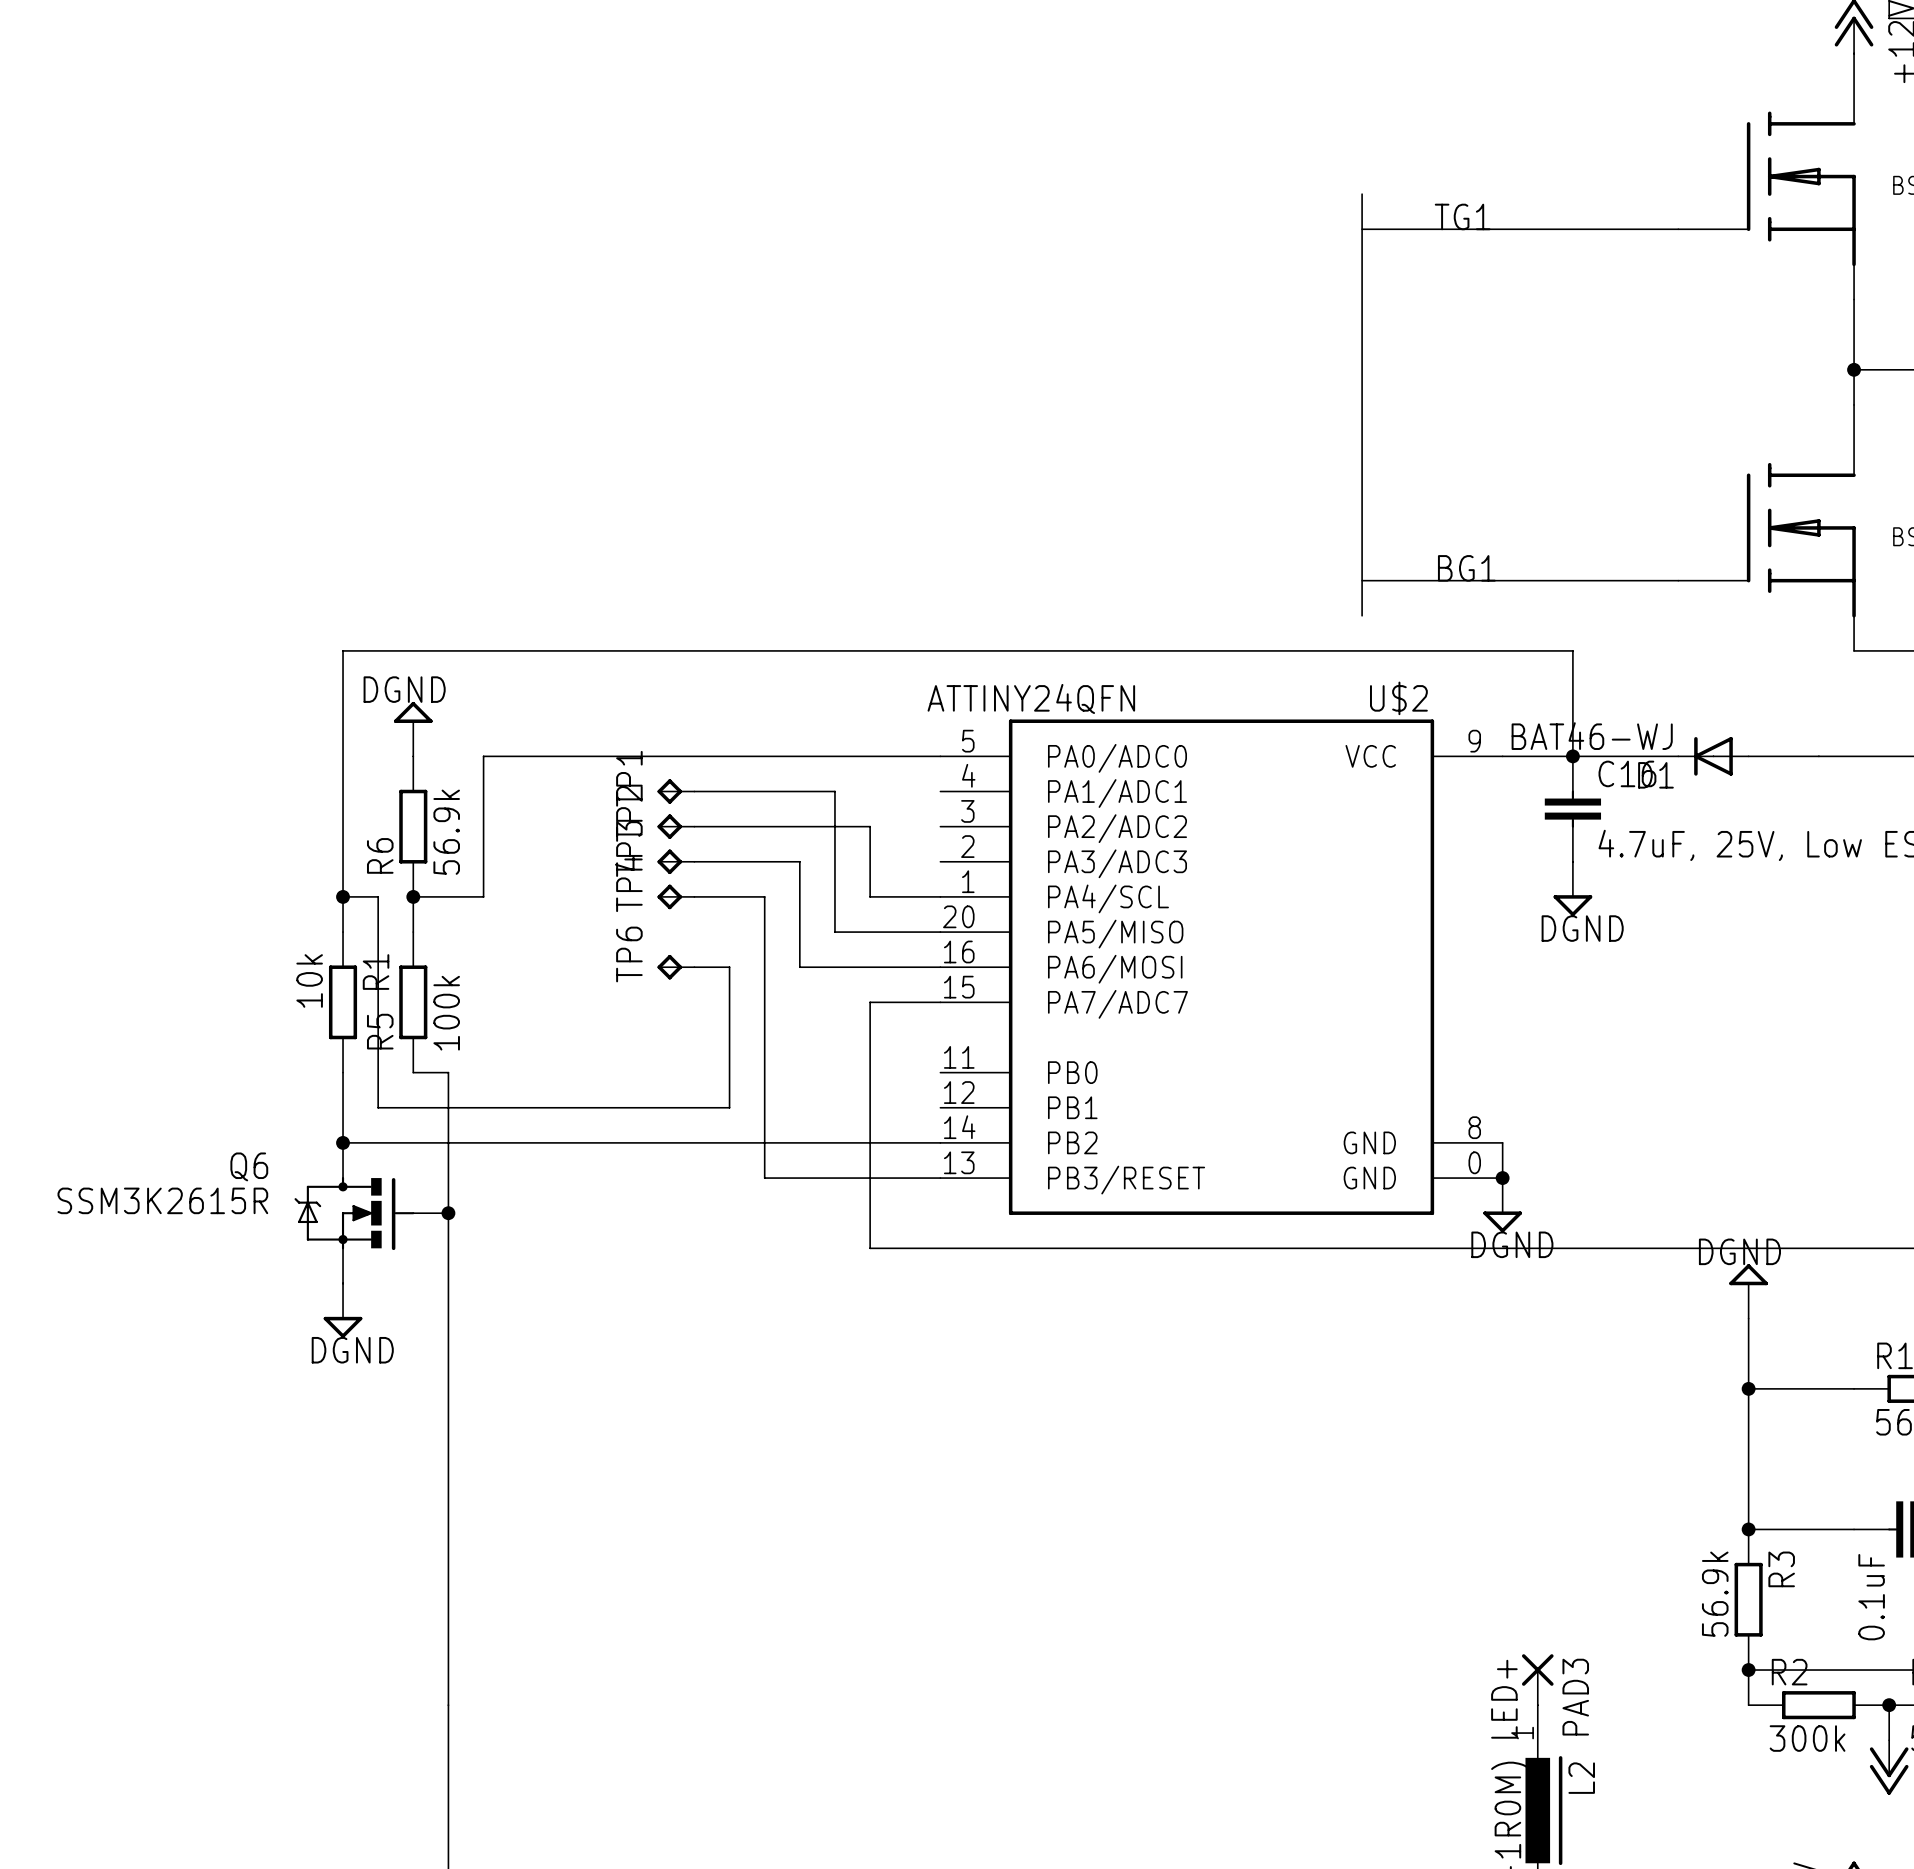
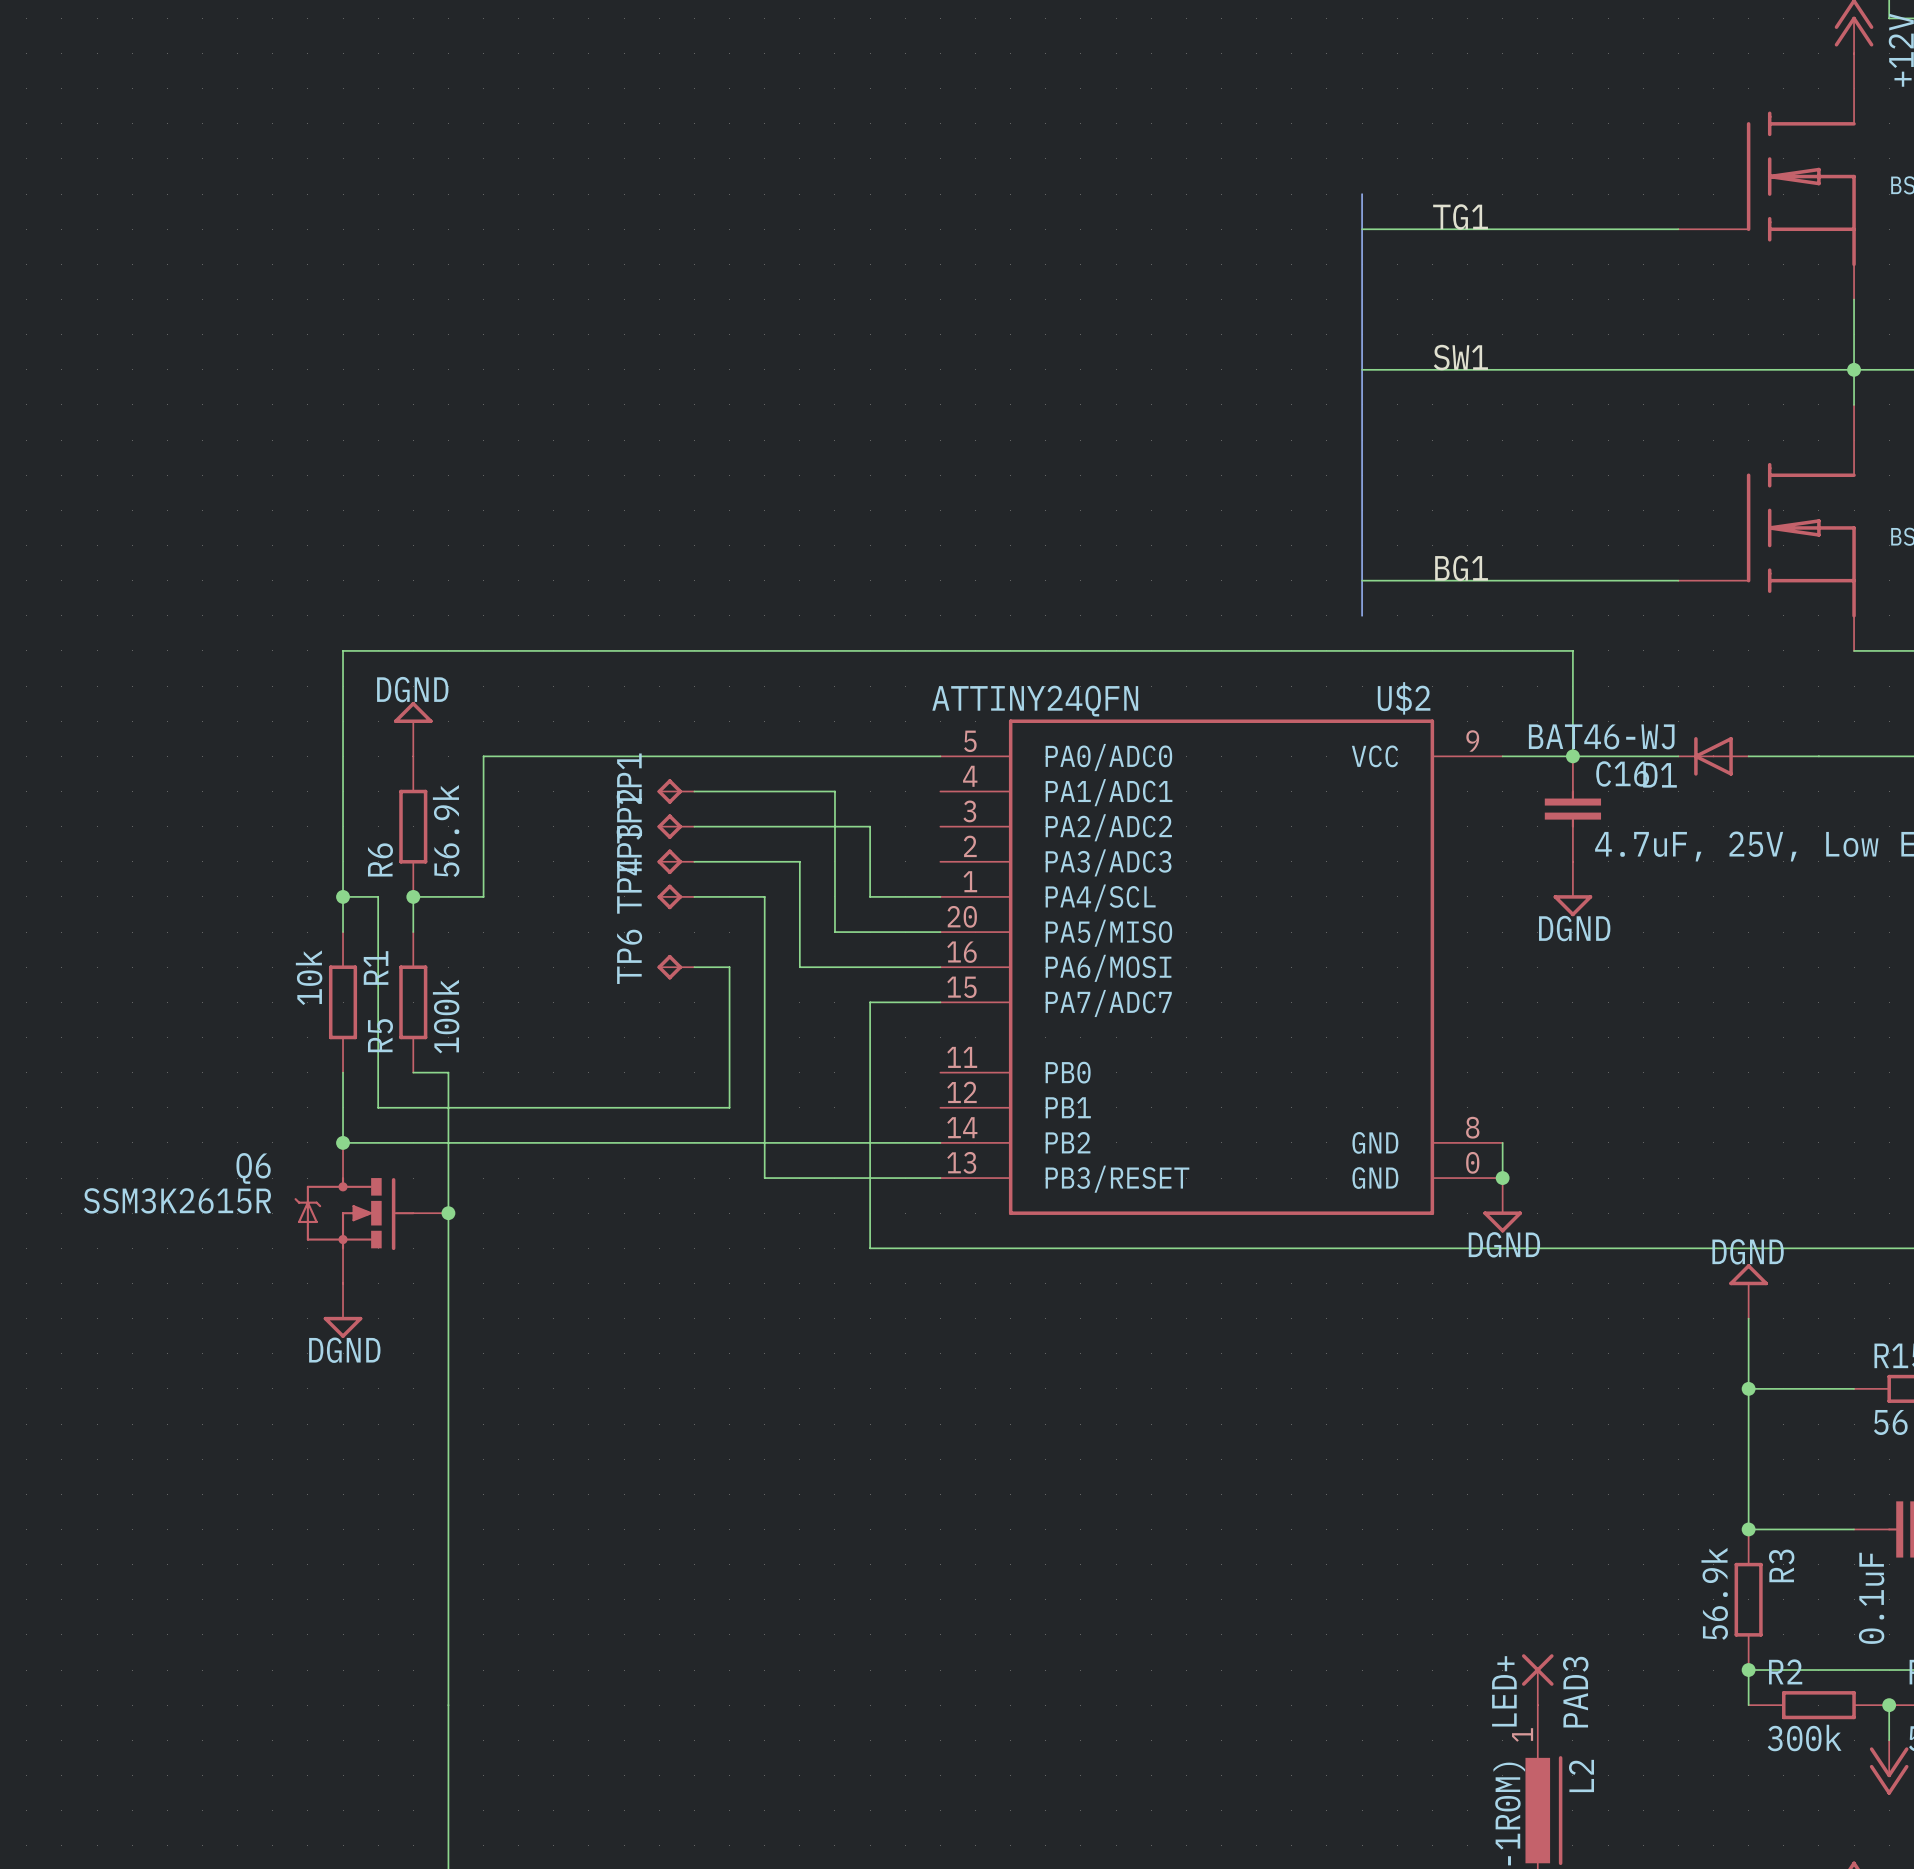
label: none -> SW1 (1460, 357)
wire: none -> (1362, 369) (1854, 369)

